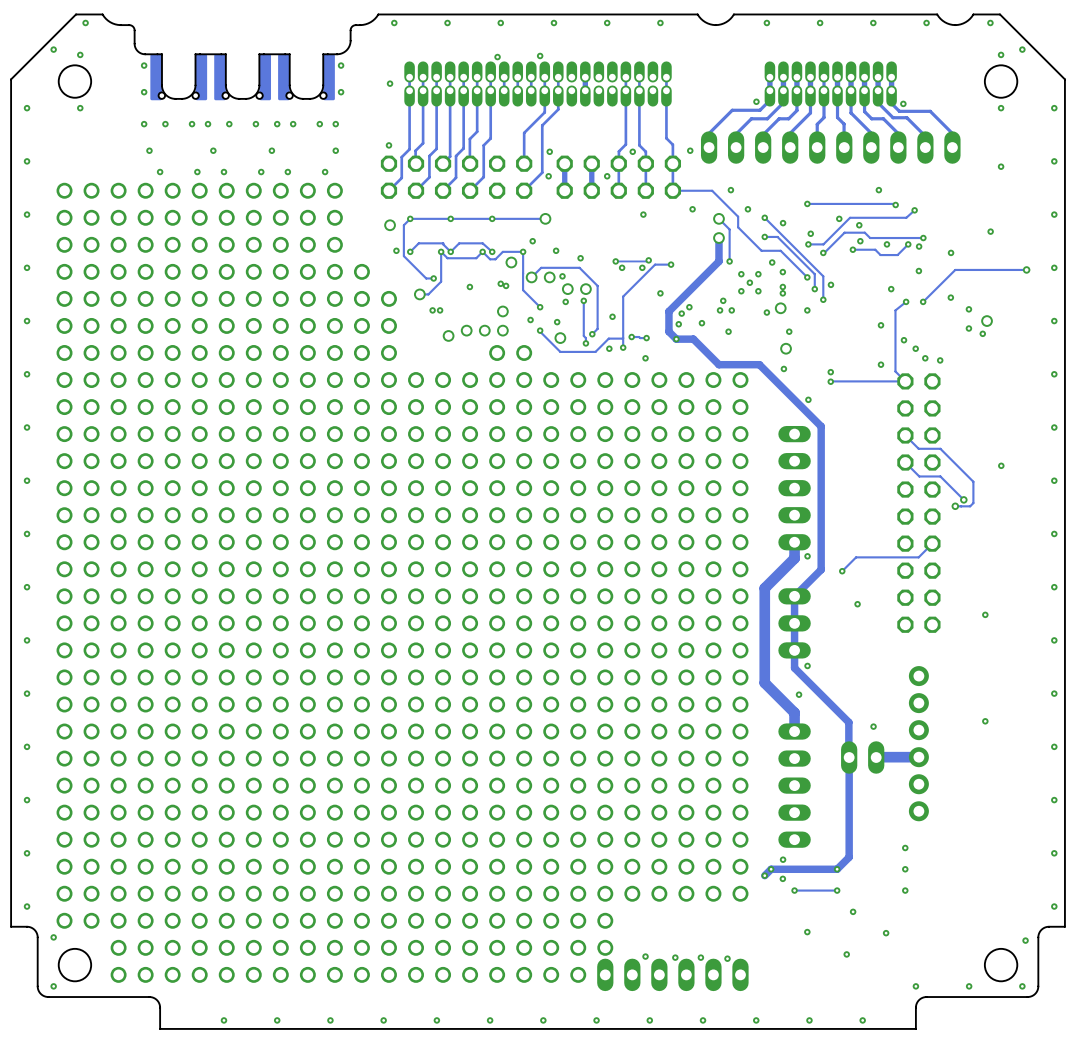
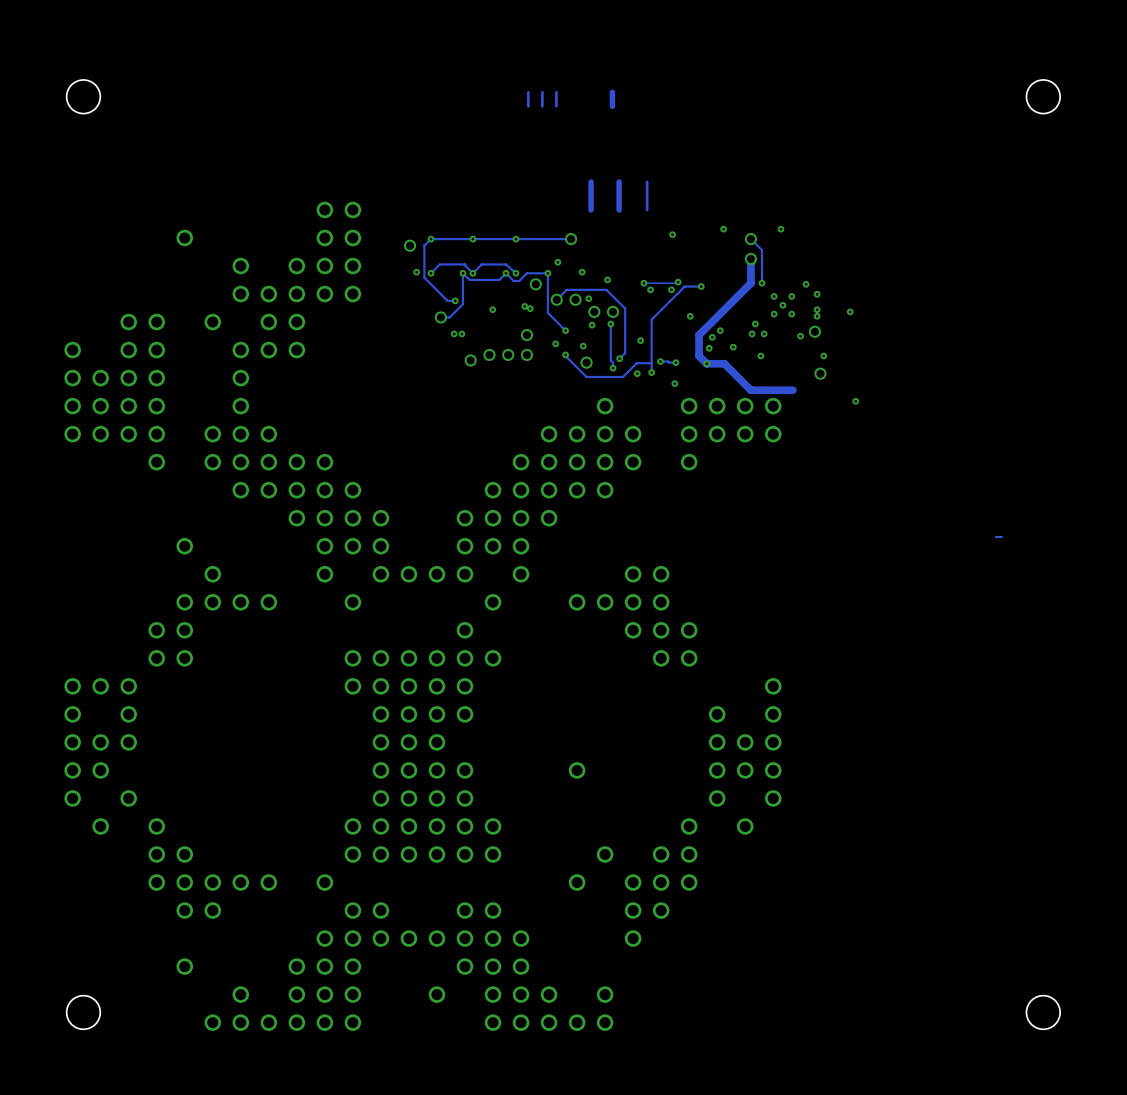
drawing: [11, 14, 1065, 1029] -> none
via: (85, 22) -> none
via: (394, 22) -> none
via: (447, 22) -> none
via: (500, 22) -> none
via: (553, 22) -> none
via: (607, 22) -> none
via: (660, 22) -> none
via: (766, 22) -> none
via: (820, 22) -> none
via: (873, 22) -> none
via: (926, 22) -> none
via: (990, 22) -> none
board edge: (120, 25) (133, 27) (134, 46) (138, 52) (157, 54) -> none
board edge: (360, 25) (351, 27) (350, 44) (346, 50) (340, 53) (327, 54) -> none
via: (53, 49) -> none
via: (1022, 49) -> none
via: (80, 54) -> none
board edge: (221, 54) (200, 54) -> none
board edge: (285, 54) (263, 54) -> none
via: (1001, 54) -> none
via: (540, 55) -> none
via: (497, 57) -> none
via: (144, 65) -> none
via: (341, 65) -> none
part: (178, 77) -> none
part: (242, 77) -> none
part: (306, 77) -> none
track: (409, 77) (409, 149) (401, 157) (401, 177) (388, 190) -> none
track: (423, 77) (423, 143) (415, 150) (416, 163) -> none
track: (436, 77) (436, 148) (429, 156) (429, 177) (416, 190) -> none
track: (450, 77) (450, 156) (443, 163) -> none
track: (463, 77) (463, 148) (456, 156) (456, 177) (443, 190) -> none
track: (477, 77) (477, 131) (469, 139) (470, 163) -> none
track: (490, 77) (490, 138) (483, 145) (483, 177) (470, 190) -> none
track: (544, 77) (544, 112) (524, 132) (524, 163) -> none
track: (558, 77) (558, 109) (542, 125) (542, 172) (524, 190) -> none
track: (625, 77) (625, 144) (618, 151) (618, 163) -> none
track: (639, 77) (639, 145) (645, 151) (645, 190) -> none
track: (666, 77) (666, 138) (672, 144) (672, 190) (712, 190) (738, 216) (738, 227) (761, 250) (780, 250) (807, 277) -> none
track: (769, 77) (769, 100) (759, 110) (732, 110) (708, 133) (709, 147) -> none
track: (783, 77) (783, 102) (767, 118) (751, 118) (735, 134) (736, 147) -> none
track: (796, 77) (796, 110) (788, 118) (779, 118) (763, 134) (763, 147) -> none
track: (810, 77) (810, 112) (790, 133) (790, 147) -> none
track: (823, 77) (823, 117) (817, 124) (817, 147) -> none
track: (837, 77) (837, 117) (844, 124) (844, 147) -> none
track: (851, 77) (851, 112) (871, 133) (871, 147) -> none
track: (864, 77) (864, 111) (871, 118) (883, 118) (898, 133) (898, 147) -> none
track: (878, 77) (878, 102) (893, 117) (906, 117) (925, 136) (925, 147) -> none
track: (891, 77) (891, 103) (899, 111) (930, 111) (952, 133) (952, 147) -> none
via: (390, 83) -> none
part: (538, 83) -> none
part: (830, 83) -> none
via: (144, 92) -> none
via: (341, 92) -> none
via: (756, 101) -> none
via: (903, 103) -> none
via: (27, 108) -> none
via: (80, 108) -> none
via: (1001, 108) -> none
via: (1054, 108) -> none
via: (144, 124) -> none
via: (165, 124) -> none
via: (192, 124) -> none
via: (208, 124) -> none
via: (229, 124) -> none
via: (255, 124) -> none
via: (277, 124) -> none
via: (293, 124) -> none
via: (319, 124) -> none
via: (335, 124) -> none
via: (388, 145) -> none
part: (830, 147) -> none
via: (149, 150) -> none
via: (213, 150) -> none
via: (271, 150) -> none
via: (335, 150) -> none
via: (690, 150) -> none
via: (549, 151) -> none
via: (632, 151) -> none
via: (27, 161) -> none
via: (1054, 161) -> none
via: (1001, 166) -> none
via: (160, 172) -> none
via: (197, 172) -> none
via: (223, 172) -> none
via: (261, 172) -> none
via: (287, 172) -> none
via: (325, 172) -> none
via: (548, 176) -> none
via: (607, 176) -> none
part: (456, 177) -> none
part: (618, 177) -> none
via: (64, 190) -> none
via: (91, 190) -> none
via: (118, 190) -> none
via: (145, 190) -> none
via: (172, 190) -> none
via: (199, 190) -> none
via: (226, 190) -> none
via: (253, 190) -> none
via: (280, 190) -> none
via: (730, 190) -> none
via: (878, 190) -> none
track: (807, 203) (895, 204) -> none
via: (807, 203) -> none
via: (895, 204) -> none
track: (914, 210) (906, 217) (850, 217) (823, 244) (808, 244) -> none
via: (914, 210) -> none
via: (27, 214) -> none
via: (1054, 214) -> none
via: (64, 217) -> none
via: (91, 217) -> none
via: (118, 217) -> none
via: (145, 217) -> none
via: (199, 217) -> none
via: (226, 217) -> none
via: (253, 217) -> none
via: (280, 217) -> none
track: (764, 217) (823, 276) (823, 299) -> none
via: (764, 217) -> none
via: (839, 218) -> none
via: (783, 223) -> none
via: (859, 225) -> none
via: (990, 231) -> none
via: (810, 233) -> none
track: (764, 236) (777, 236) (814, 274) (814, 289) -> none
via: (764, 236) -> none
track: (923, 238) (870, 238) (864, 232) (844, 232) (823, 252) -> none
via: (923, 238) -> none
via: (860, 241) -> none
via: (64, 244) -> none
via: (91, 244) -> none
via: (118, 244) -> none
via: (145, 244) -> none
via: (172, 244) -> none
via: (199, 244) -> none
via: (253, 244) -> none
via: (808, 244) -> none
via: (886, 244) -> none
track: (908, 244) (897, 255) (880, 255) (875, 249) (852, 249) -> none
via: (908, 244) -> none
via: (919, 246) -> none
via: (852, 249) -> none
via: (823, 252) -> none
via: (951, 252) -> none
via: (27, 267) -> none
via: (1054, 267) -> none
track: (1026, 269) (955, 269) (923, 301) -> none
via: (1026, 269) -> none
via: (64, 271) -> none
via: (91, 271) -> none
via: (118, 271) -> none
via: (145, 271) -> none
via: (172, 271) -> none
via: (199, 271) -> none
via: (361, 271) -> none
via: (918, 271) -> none
via: (807, 277) -> none
via: (830, 284) -> none
via: (891, 289) -> none
via: (950, 297) -> none
via: (64, 298) -> none
via: (91, 298) -> none
via: (172, 298) -> none
via: (226, 298) -> none
via: (307, 298) -> none
via: (334, 298) -> none
via: (361, 298) -> none
via: (388, 298) -> none
via: (823, 299) -> none
track: (906, 301) (895, 310) (895, 371) (905, 381) (830, 381) -> none
via: (906, 301) -> none
via: (923, 301) -> none
via: (968, 309) -> none
via: (807, 310) -> none
via: (27, 321) -> none
part: (987, 321) -> none
via: (1054, 321) -> none
via: (91, 325) -> none
via: (172, 325) -> none
via: (199, 325) -> none
via: (307, 325) -> none
via: (334, 325) -> none
via: (361, 325) -> none
via: (388, 325) -> none
via: (881, 325) -> none
via: (968, 328) -> none
via: (982, 333) -> none
via: (903, 340) -> none
via: (915, 348) -> none
via: (172, 352) -> none
via: (199, 352) -> none
via: (253, 352) -> none
via: (280, 352) -> none
via: (307, 352) -> none
via: (334, 352) -> none
via: (361, 352) -> none
via: (388, 352) -> none
via: (497, 352) -> none
via: (524, 352) -> none
via: (925, 358) -> none
via: (940, 360) -> none
track: (759, 364) (821, 426) (821, 569) (794, 596) (794, 668) (848, 722) (849, 857) (837, 869) (771, 869) (764, 875) -> none
via: (881, 364) -> none
via: (783, 368) -> none
via: (830, 372) -> none
via: (27, 374) -> none
via: (1054, 374) -> none
via: none -> (855, 401)
via: (172, 380) -> none
via: (199, 380) -> none
via: (253, 380) -> none
via: (280, 380) -> none
via: (307, 380) -> none
via: (334, 380) -> none
via: (361, 380) -> none
via: (388, 380) -> none
via: (416, 380) -> none
via: (443, 380) -> none
via: (470, 380) -> none
via: (497, 380) -> none
via: (524, 380) -> none
via: (551, 380) -> none
via: (605, 380) -> none
via: (632, 380) -> none
via: (830, 381) -> none
via: (808, 399) -> none
via: (172, 407) -> none
via: (280, 407) -> none
via: (307, 407) -> none
via: (334, 407) -> none
via: (361, 407) -> none
via: (388, 407) -> none
via: (416, 407) -> none
via: (443, 407) -> none
via: (470, 407) -> none
via: (497, 407) -> none
via: (632, 407) -> none
via: (27, 427) -> none
via: (1054, 427) -> none
via: (64, 434) -> none
via: (91, 434) -> none
via: (118, 434) -> none
via: (172, 434) -> none
via: (334, 434) -> none
via: (361, 434) -> none
via: (388, 434) -> none
via: (416, 434) -> none
via: (443, 434) -> none
via: (470, 434) -> none
via: (632, 434) -> none
via: (686, 434) -> none
via: (713, 434) -> none
via: (740, 434) -> none
track: (905, 435) (918, 448) (940, 448) (973, 481) (973, 503) (970, 506) (961, 506) -> none
via: (64, 461) -> none
via: (91, 461) -> none
via: (118, 461) -> none
via: (145, 461) -> none
via: (172, 461) -> none
via: (199, 461) -> none
via: (361, 461) -> none
via: (388, 461) -> none
via: (416, 461) -> none
via: (443, 461) -> none
via: (605, 461) -> none
via: (632, 461) -> none
via: (659, 461) -> none
via: (686, 461) -> none
via: (713, 461) -> none
via: (740, 461) -> none
track: (905, 462) (919, 476) (940, 476) (963, 499) -> none
via: (1001, 465) -> none
via: (27, 480) -> none
via: (1054, 480) -> none
via: (64, 488) -> none
via: (91, 488) -> none
via: (118, 488) -> none
via: (145, 488) -> none
via: (172, 488) -> none
via: (199, 488) -> none
via: (226, 488) -> none
via: (253, 488) -> none
via: (388, 488) -> none
via: (416, 488) -> none
via: (551, 488) -> none
via: (578, 488) -> none
via: (605, 488) -> none
via: (632, 488) -> none
via: (659, 488) -> none
via: (686, 488) -> none
via: (713, 488) -> none
via: (740, 488) -> none
part: (794, 488) -> none
via: (963, 499) -> none
part: (918, 503) -> none
via: (955, 506) -> none
via: (64, 515) -> none
via: (91, 515) -> none
via: (118, 515) -> none
via: (145, 515) -> none
via: (199, 515) -> none
via: (226, 515) -> none
via: (253, 515) -> none
via: (280, 515) -> none
via: (388, 515) -> none
via: (416, 515) -> none
via: (524, 515) -> none
via: (551, 515) -> none
via: (578, 515) -> none
via: (605, 515) -> none
via: (632, 515) -> none
via: (659, 515) -> none
via: (686, 515) -> none
via: (713, 515) -> none
via: (740, 515) -> none
via: (27, 533) -> none
via: (1054, 533) -> none
via: (64, 542) -> none
via: (91, 542) -> none
via: (118, 542) -> none
via: (145, 542) -> none
via: (172, 542) -> none
via: (226, 542) -> none
via: (253, 542) -> none
via: (280, 542) -> none
via: (334, 542) -> none
via: (470, 542) -> none
via: (524, 542) -> none
via: (551, 542) -> none
via: (578, 542) -> none
via: (659, 542) -> none
via: (686, 542) -> none
via: (713, 542) -> none
via: (740, 542) -> none
track: (794, 542) (794, 558) (764, 588) (764, 682) (794, 712) (794, 731) -> none
track: (932, 543) (918, 557) (856, 557) (842, 571) -> none
via: (807, 556) -> none
via: (64, 569) -> none
via: (91, 569) -> none
via: (118, 569) -> none
via: (145, 569) -> none
via: (280, 569) -> none
via: (307, 569) -> none
via: (361, 569) -> none
via: (388, 569) -> none
via: (416, 569) -> none
via: (443, 569) -> none
via: (497, 569) -> none
via: (524, 569) -> none
via: (659, 569) -> none
via: (686, 569) -> none
via: (713, 569) -> none
via: (740, 569) -> none
via: (842, 571) -> none
via: (27, 587) -> none
via: (1054, 587) -> none
via: (64, 596) -> none
via: (91, 596) -> none
via: (118, 596) -> none
via: (199, 596) -> none
via: (226, 596) -> none
via: (253, 596) -> none
via: (280, 596) -> none
via: (307, 596) -> none
via: (334, 596) -> none
via: (361, 596) -> none
via: (388, 596) -> none
via: (416, 596) -> none
via: (470, 596) -> none
via: (497, 596) -> none
via: (524, 596) -> none
via: (551, 596) -> none
via: (578, 596) -> none
via: (686, 596) -> none
via: (713, 596) -> none
via: (740, 596) -> none
via: (857, 604) -> none
via: (985, 614) -> none
via: (64, 623) -> none
via: (91, 623) -> none
via: (118, 623) -> none
via: (199, 623) -> none
via: (226, 623) -> none
via: (253, 623) -> none
via: (280, 623) -> none
via: (307, 623) -> none
via: (497, 623) -> none
via: (524, 623) -> none
via: (551, 623) -> none
via: (578, 623) -> none
via: (605, 623) -> none
via: (686, 623) -> none
via: (713, 623) -> none
via: (740, 623) -> none
part: (794, 623) -> none
via: (27, 640) -> none
via: (1054, 640) -> none
via: (145, 650) -> none
via: (172, 650) -> none
via: (199, 650) -> none
via: (226, 650) -> none
via: (253, 650) -> none
via: (280, 650) -> none
via: (307, 650) -> none
via: (470, 650) -> none
via: (497, 650) -> none
via: (524, 650) -> none
via: (551, 650) -> none
via: (578, 650) -> none
via: (605, 650) -> none
via: (632, 650) -> none
via: (659, 650) -> none
via: (686, 650) -> none
via: (713, 650) -> none
via: (807, 665) -> none
via: (91, 677) -> none
via: (145, 677) -> none
via: (172, 677) -> none
via: (199, 677) -> none
via: (226, 677) -> none
via: (253, 677) -> none
via: (280, 677) -> none
via: (307, 677) -> none
via: (334, 677) -> none
via: (470, 677) -> none
via: (497, 677) -> none
via: (524, 677) -> none
via: (551, 677) -> none
via: (578, 677) -> none
via: (605, 677) -> none
via: (632, 677) -> none
via: (659, 677) -> none
via: (713, 677) -> none
via: (27, 693) -> none
via: (1054, 693) -> none
via: (799, 694) -> none
via: (145, 704) -> none
via: (172, 704) -> none
via: (199, 704) -> none
via: (226, 704) -> none
via: (253, 704) -> none
via: (280, 704) -> none
via: (307, 704) -> none
via: (334, 704) -> none
via: (443, 704) -> none
via: (470, 704) -> none
via: (497, 704) -> none
via: (524, 704) -> none
via: (551, 704) -> none
via: (578, 704) -> none
via: (605, 704) -> none
via: (632, 704) -> none
via: (659, 704) -> none
via: (985, 721) -> none
via: (873, 726) -> none
via: (118, 731) -> none
via: (145, 731) -> none
via: (172, 731) -> none
via: (199, 731) -> none
via: (226, 731) -> none
via: (253, 731) -> none
via: (280, 731) -> none
via: (307, 731) -> none
via: (334, 731) -> none
via: (470, 731) -> none
via: (497, 731) -> none
via: (524, 731) -> none
via: (578, 731) -> none
via: (605, 731) -> none
via: (632, 731) -> none
via: (659, 731) -> none
part: (918, 743) -> none
via: (27, 746) -> none
via: (1054, 746) -> none
part: (862, 757) -> none
track: (918, 757) (876, 757) -> none
via: (91, 758) -> none
via: (145, 758) -> none
via: (172, 758) -> none
via: (199, 758) -> none
via: (226, 758) -> none
via: (253, 758) -> none
via: (280, 758) -> none
via: (307, 758) -> none
via: (334, 758) -> none
via: (470, 758) -> none
via: (497, 758) -> none
via: (524, 758) -> none
via: (551, 758) -> none
via: (578, 758) -> none
via: (605, 758) -> none
via: (632, 758) -> none
via: (659, 758) -> none
via: (713, 758) -> none
via: (64, 785) -> none
via: (118, 785) -> none
via: (172, 785) -> none
via: (199, 785) -> none
via: (226, 785) -> none
via: (253, 785) -> none
via: (280, 785) -> none
via: (307, 785) -> none
via: (497, 785) -> none
via: (524, 785) -> none
via: (551, 785) -> none
via: (578, 785) -> none
via: (605, 785) -> none
via: (632, 785) -> none
via: (686, 785) -> none
via: (740, 785) -> none
part: (794, 785) -> none
via: (27, 800) -> none
via: (1054, 800) -> none
via: (64, 812) -> none
via: (91, 812) -> none
via: (118, 812) -> none
via: (199, 812) -> none
via: (226, 812) -> none
via: (253, 812) -> none
via: (280, 812) -> none
via: (307, 812) -> none
via: (497, 812) -> none
via: (524, 812) -> none
via: (551, 812) -> none
via: (605, 812) -> none
via: (686, 812) -> none
via: (713, 812) -> none
via: (740, 812) -> none
via: (64, 839) -> none
via: (91, 839) -> none
via: (118, 839) -> none
via: (280, 839) -> none
via: (334, 839) -> none
via: (361, 839) -> none
via: (388, 839) -> none
via: (416, 839) -> none
via: (443, 839) -> none
via: (470, 839) -> none
via: (497, 839) -> none
via: (524, 839) -> none
via: (578, 839) -> none
via: (686, 839) -> none
via: (713, 839) -> none
via: (740, 839) -> none
via: (905, 847) -> none
via: (27, 853) -> none
via: (1054, 853) -> none
via: (783, 859) -> none
via: (64, 866) -> none
via: (91, 866) -> none
via: (118, 866) -> none
via: (145, 866) -> none
via: (226, 866) -> none
via: (253, 866) -> none
via: (280, 866) -> none
via: (307, 866) -> none
via: (388, 866) -> none
via: (416, 866) -> none
via: (497, 866) -> none
via: (524, 866) -> none
via: (551, 866) -> none
via: (578, 866) -> none
via: (659, 866) -> none
via: (686, 866) -> none
via: (713, 866) -> none
via: (740, 866) -> none
via: (771, 869) -> none
via: (837, 869) -> none
via: (905, 869) -> none
via: (764, 875) -> none
via: (782, 878) -> none
via: (794, 890) -> none
track: (837, 890) (794, 890) -> none
via: (837, 890) -> none
via: (905, 890) -> none
via: (64, 893) -> none
via: (91, 893) -> none
via: (118, 893) -> none
via: (145, 893) -> none
via: (172, 893) -> none
via: (199, 893) -> none
via: (226, 893) -> none
via: (253, 893) -> none
via: (280, 893) -> none
via: (524, 893) -> none
via: (551, 893) -> none
via: (578, 893) -> none
via: (632, 893) -> none
via: (659, 893) -> none
via: (686, 893) -> none
via: (713, 893) -> none
via: (740, 893) -> none
via: (27, 906) -> none
via: (1054, 906) -> none
via: (853, 911) -> none
via: (64, 920) -> none
via: (91, 920) -> none
via: (118, 920) -> none
via: (145, 920) -> none
via: (199, 920) -> none
via: (226, 920) -> none
via: (253, 920) -> none
via: (361, 920) -> none
via: (388, 920) -> none
via: (416, 920) -> none
via: (524, 920) -> none
via: (551, 920) -> none
via: (578, 920) -> none
via: (605, 920) -> none
via: (807, 932) -> none
via: (886, 933) -> none
via: (53, 937) -> none
via: (1025, 940) -> none
via: (118, 947) -> none
via: (145, 947) -> none
via: (172, 947) -> none
via: (199, 947) -> none
via: (253, 947) -> none
via: (361, 947) -> none
via: (388, 947) -> none
via: (443, 947) -> none
via: (551, 947) -> none
via: (605, 947) -> none
via: (846, 954) -> none
via: (645, 956) -> none
via: (675, 957) -> none
via: (700, 957) -> none
via: (727, 958) -> none
via: (118, 974) -> none
via: (145, 974) -> none
via: (172, 974) -> none
via: (361, 974) -> none
via: (388, 974) -> none
via: (416, 974) -> none
via: (443, 974) -> none
part: (672, 974) -> none
via: (53, 986) -> none
via: (915, 986) -> none
via: (969, 986) -> none
via: (1022, 986) -> none
via: (223, 1020) -> none
via: (277, 1020) -> none
via: (330, 1020) -> none
via: (383, 1020) -> none
via: (436, 1020) -> none
via: (490, 1020) -> none
via: (543, 1020) -> none
via: (596, 1020) -> none
via: (649, 1020) -> none
via: (703, 1020) -> none
via: (756, 1020) -> none
via: (809, 1020) -> none
via: (862, 1020) -> none

